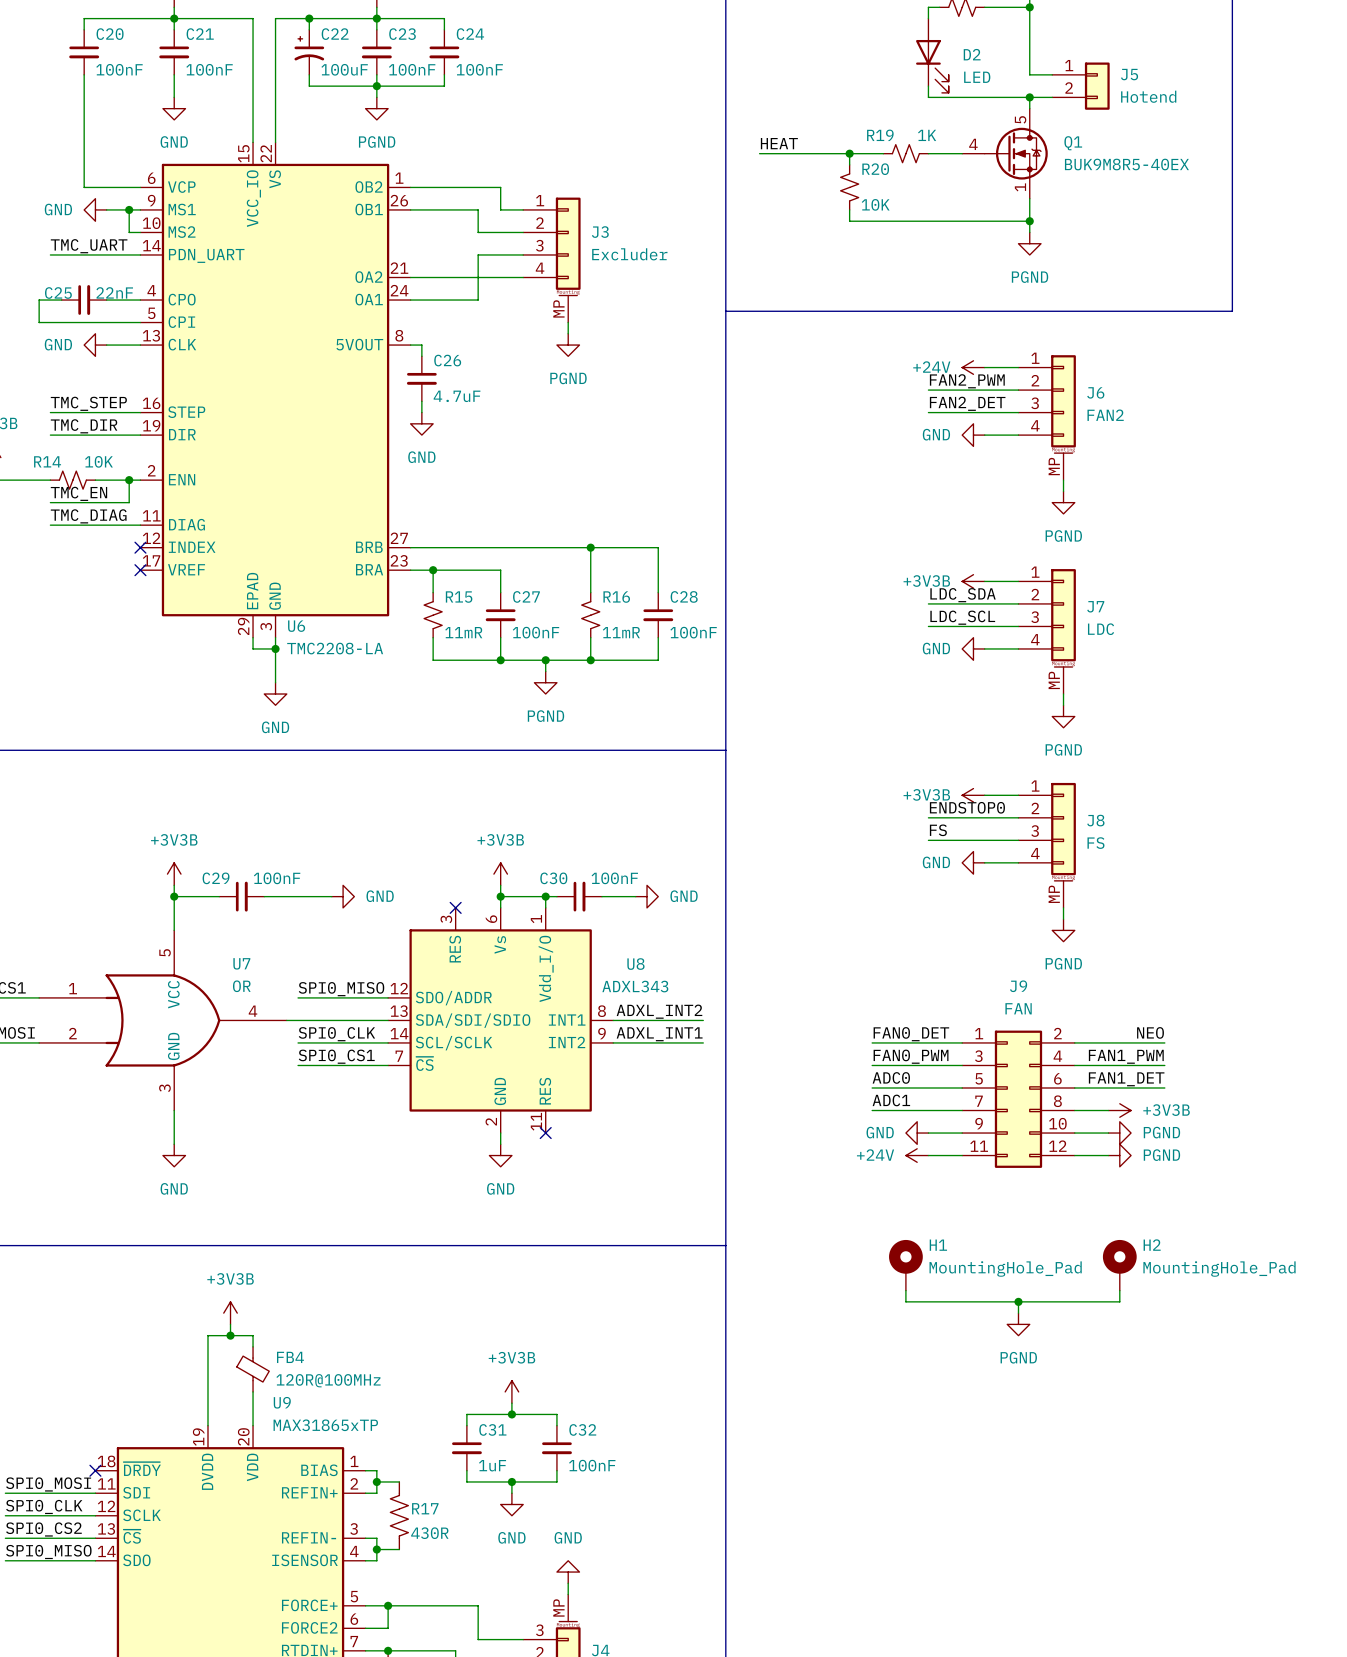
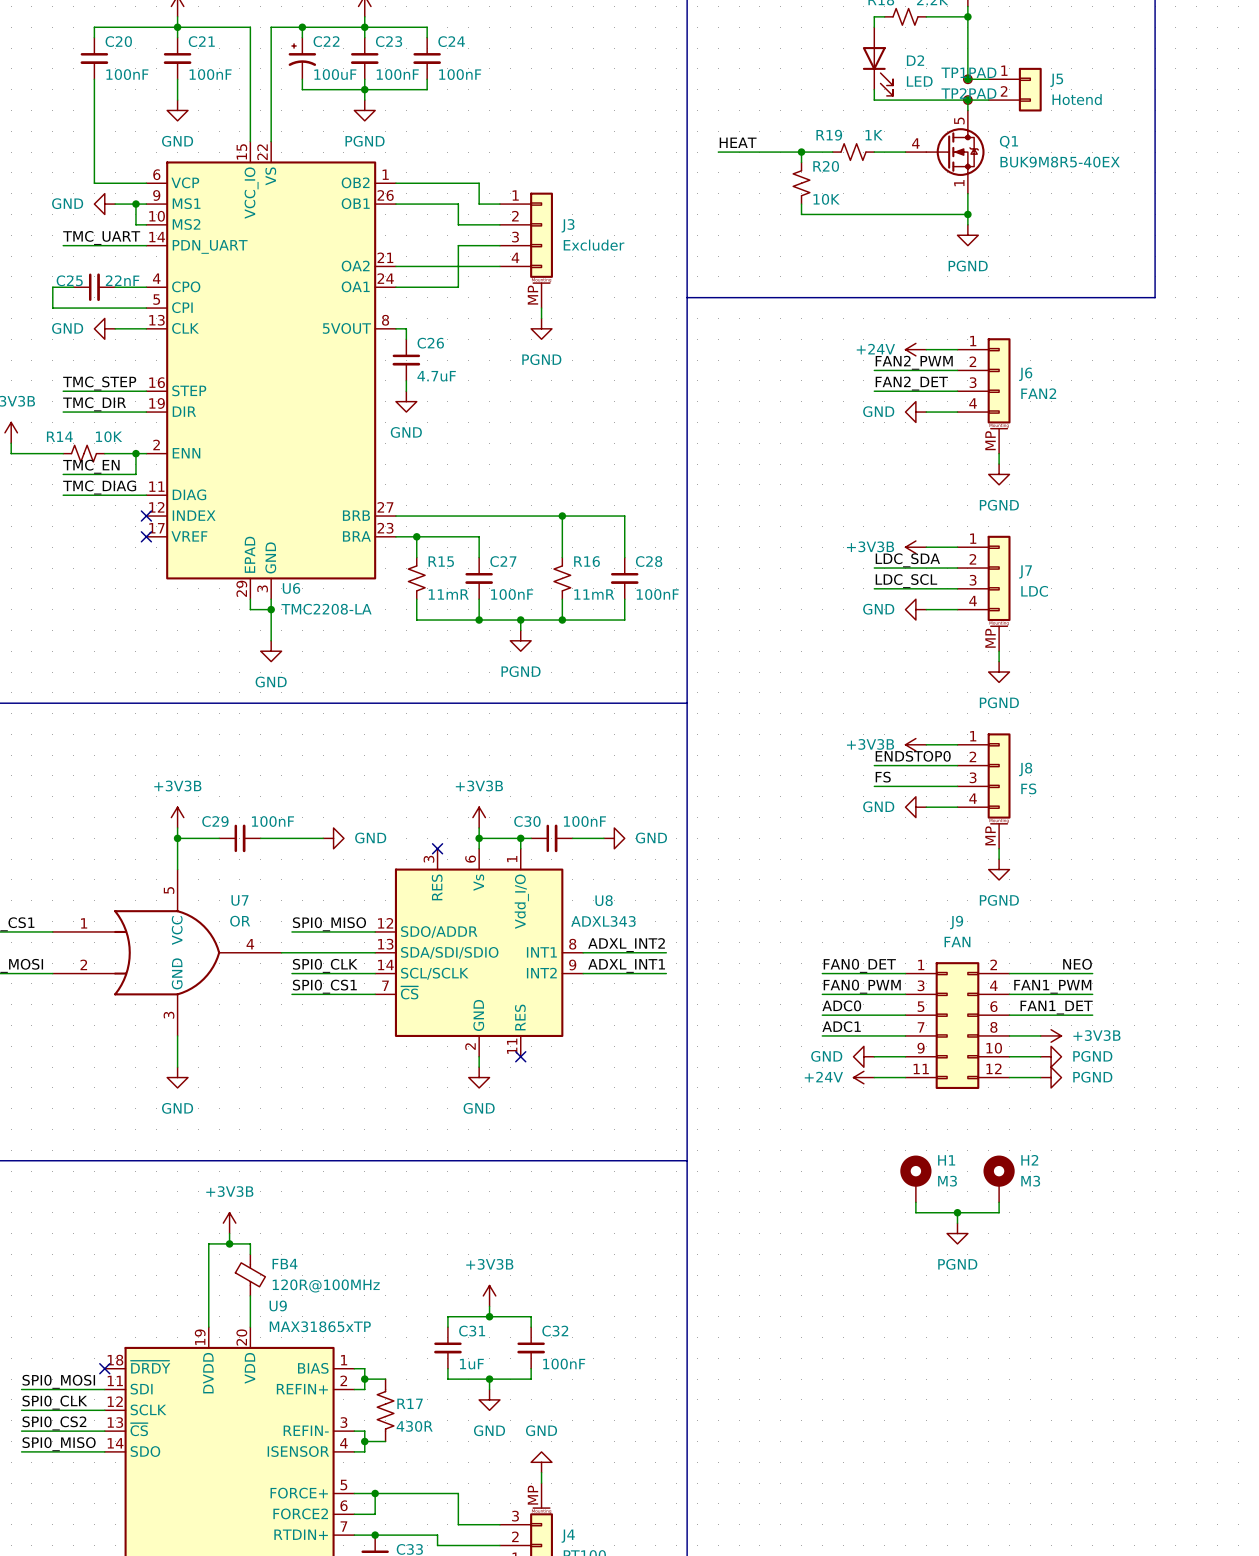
TP1: none -> PAD (967, 79)
junction: none -> (967, 79)
TP2: none -> PAD (967, 100)
H1 position: (905, 1265) -> (915, 1178)
H2 position: (1119, 1265) -> (999, 1178)
H1 value: MountingHole_Pad (1005, 1268) -> M3 (947, 1181)
H2 value: MountingHole_Pad (1219, 1268) -> M3 (1030, 1181)
wire: (905, 1290) (905, 1301) (973, 1301) -> (915, 1202) (915, 1212)
wire: (1119, 1290) (1119, 1301) (1063, 1301) -> (999, 1202) (999, 1212)

